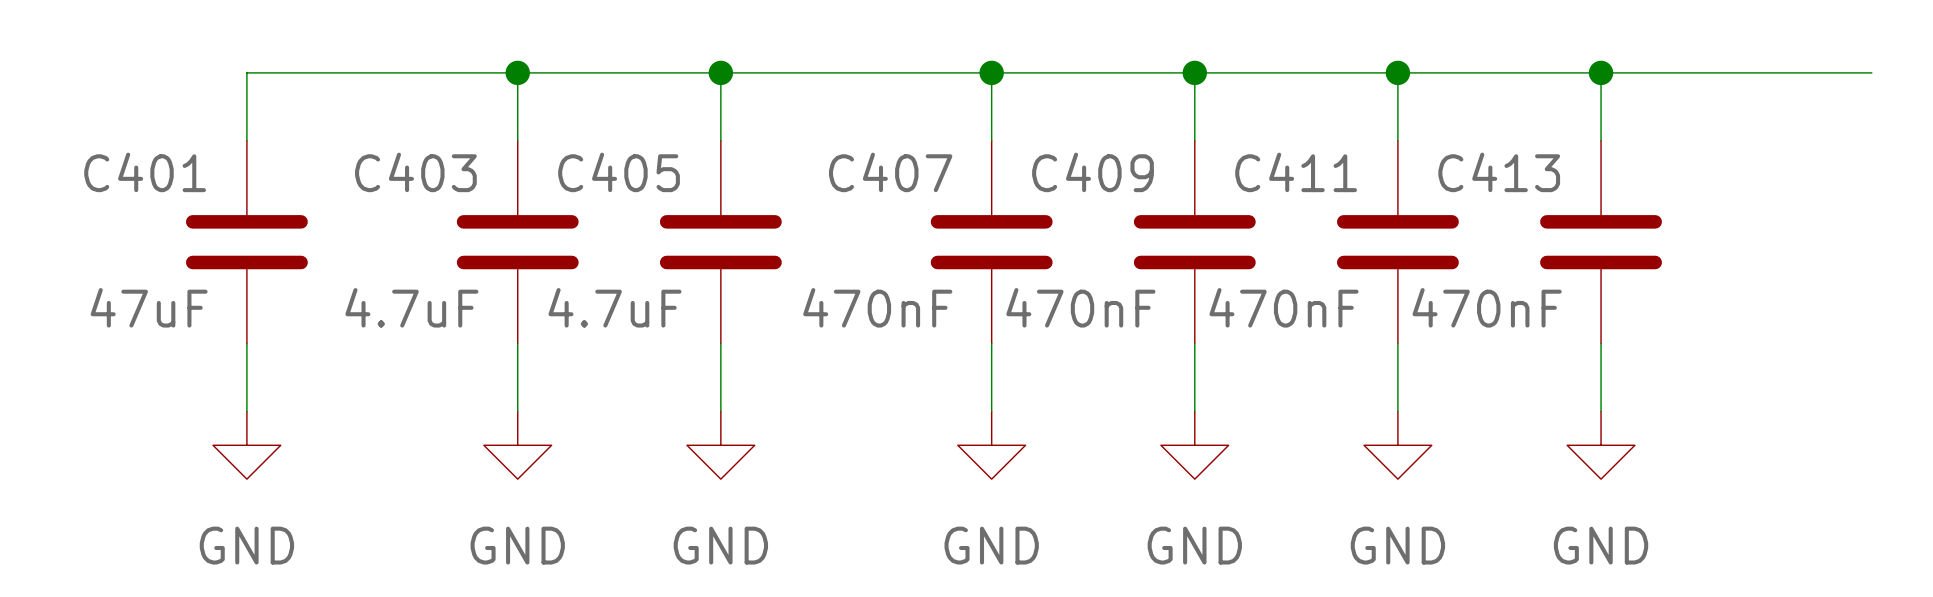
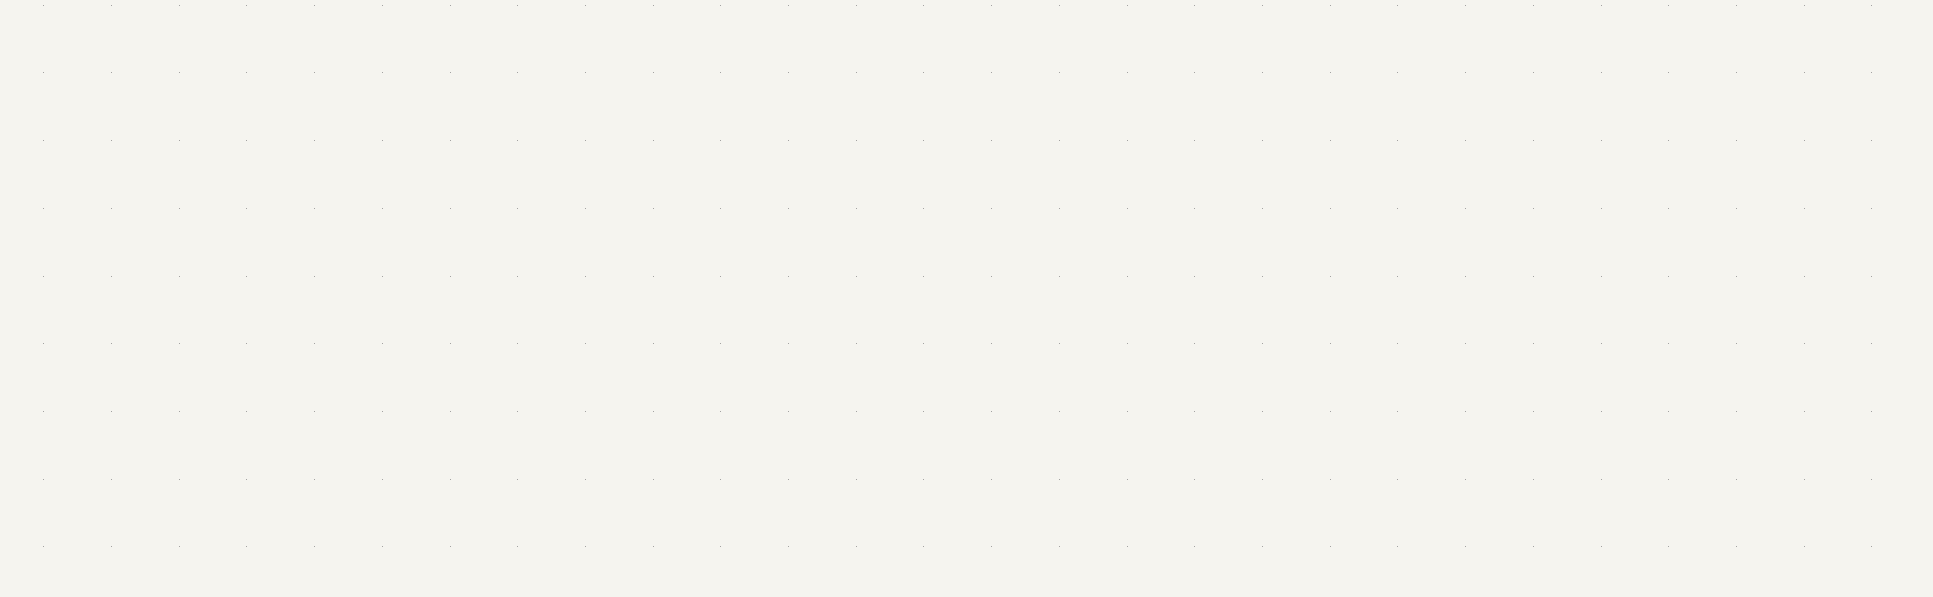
wire: (517, 72) (517, 140) -> none
junction: (517, 72) -> none
wire: (720, 72) (720, 140) -> none
junction: (720, 72) -> none
wire: (991, 72) (991, 140) -> none
junction: (991, 72) -> none
wire: (1194, 72) (1194, 140) -> none
junction: (1194, 72) -> none
wire: (1397, 72) (1397, 140) -> none
junction: (1397, 72) -> none
wire: (1601, 72) (1601, 140) -> none
junction: (1601, 72) -> none
wire: (1871, 72) (246, 72) (246, 140) -> none
C401: 47uF (246, 242) -> none
C403: 4.7uF (517, 242) -> none
C405: 4.7uF (720, 242) -> none
C407: 470nF (991, 242) -> none
C409: 470nF (1194, 242) -> none
C411: 470nF (1397, 242) -> none
C413: 470nF (1601, 242) -> none
wire: (246, 343) (246, 411) -> none
wire: (517, 343) (517, 411) -> none
wire: (720, 343) (720, 411) -> none
wire: (991, 343) (991, 411) -> none
wire: (1194, 343) (1194, 411) -> none
wire: (1397, 343) (1397, 411) -> none
wire: (1601, 343) (1601, 411) -> none
power symbol: GND (246, 445) -> none
power symbol: GND (517, 445) -> none
power symbol: GND (720, 445) -> none
power symbol: GND (991, 445) -> none
power symbol: GND (1194, 445) -> none
power symbol: GND (1397, 445) -> none
power symbol: GND (1601, 445) -> none

